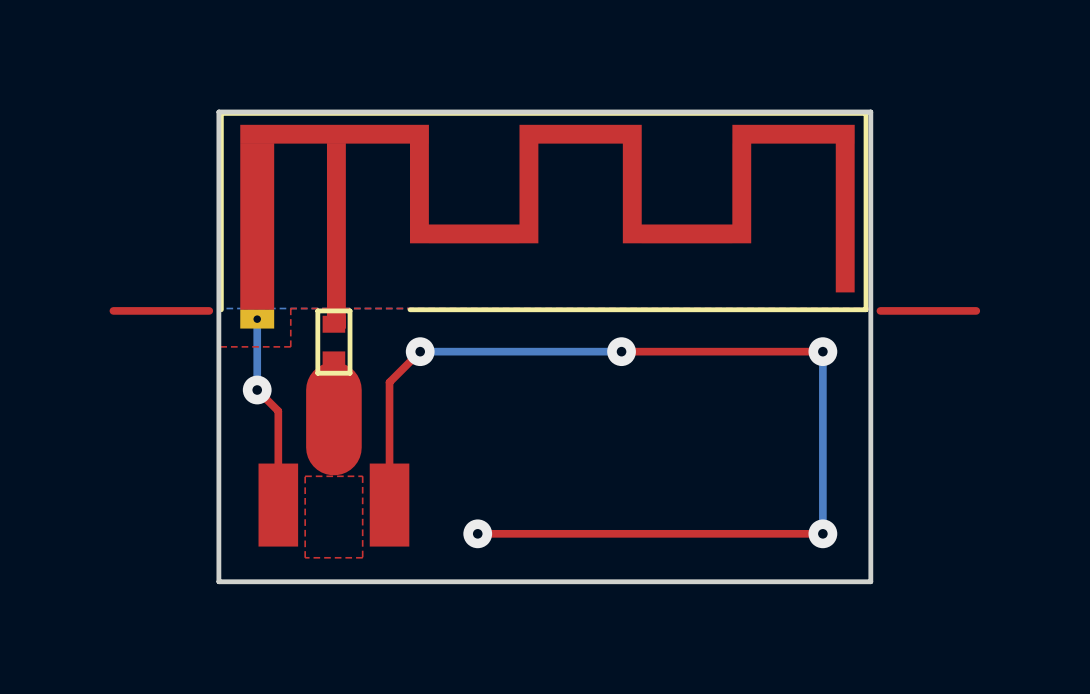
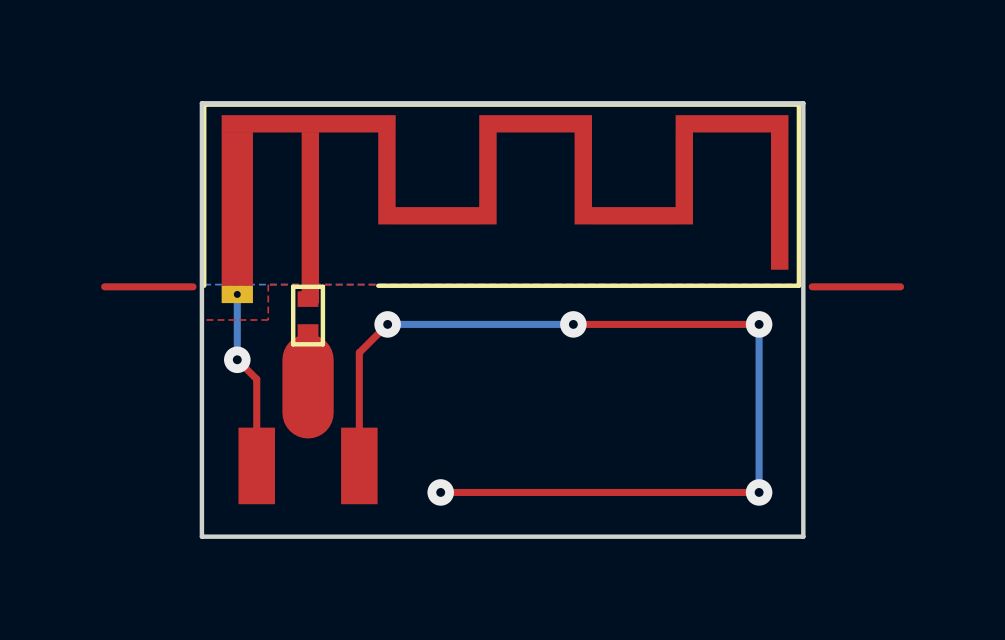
top zone outline: (305, 476) (305, 557) (362, 557) (362, 476) (305, 476) -> none

